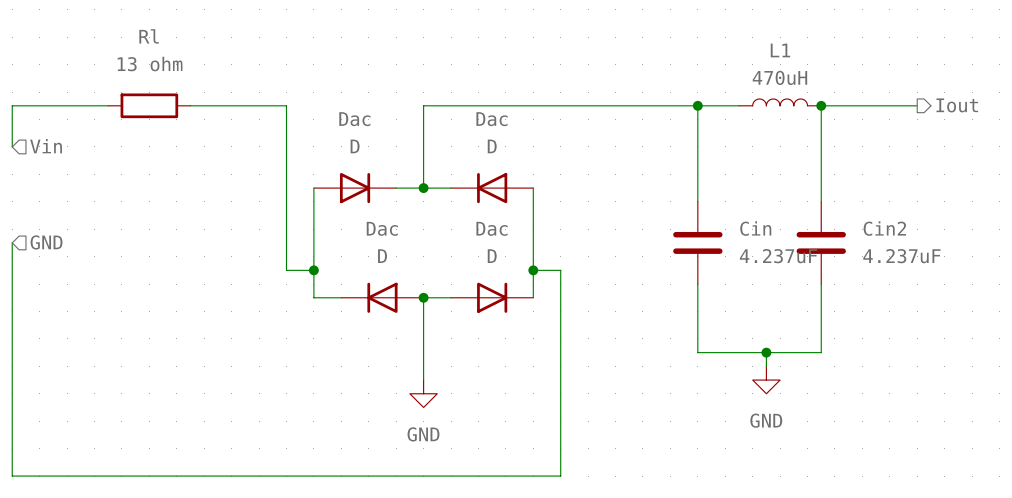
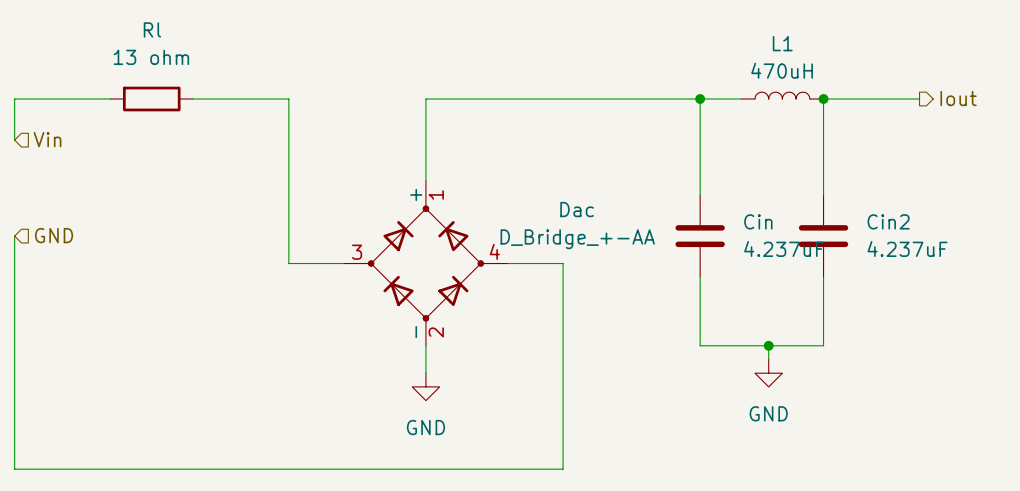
wire: (313, 188) (313, 297) (341, 297) -> none
Dac: D (355, 188) -> none
wire: (396, 188) (451, 188) -> none
junction: (423, 188) -> none
Dac: D (492, 188) -> none
wire: (533, 188) (533, 297) -> none
wire: none -> (316, 263) (343, 263)
junction: (313, 270) -> none
Dac: none -> D_Bridge_+-AA (425, 263)
wire: none -> (508, 263) (535, 263)
junction: (533, 270) -> none
Dac: D (382, 297) -> none
junction: (423, 297) -> none
wire: (451, 297) (423, 297) (423, 352) -> none
Dac: D (492, 297) -> none

